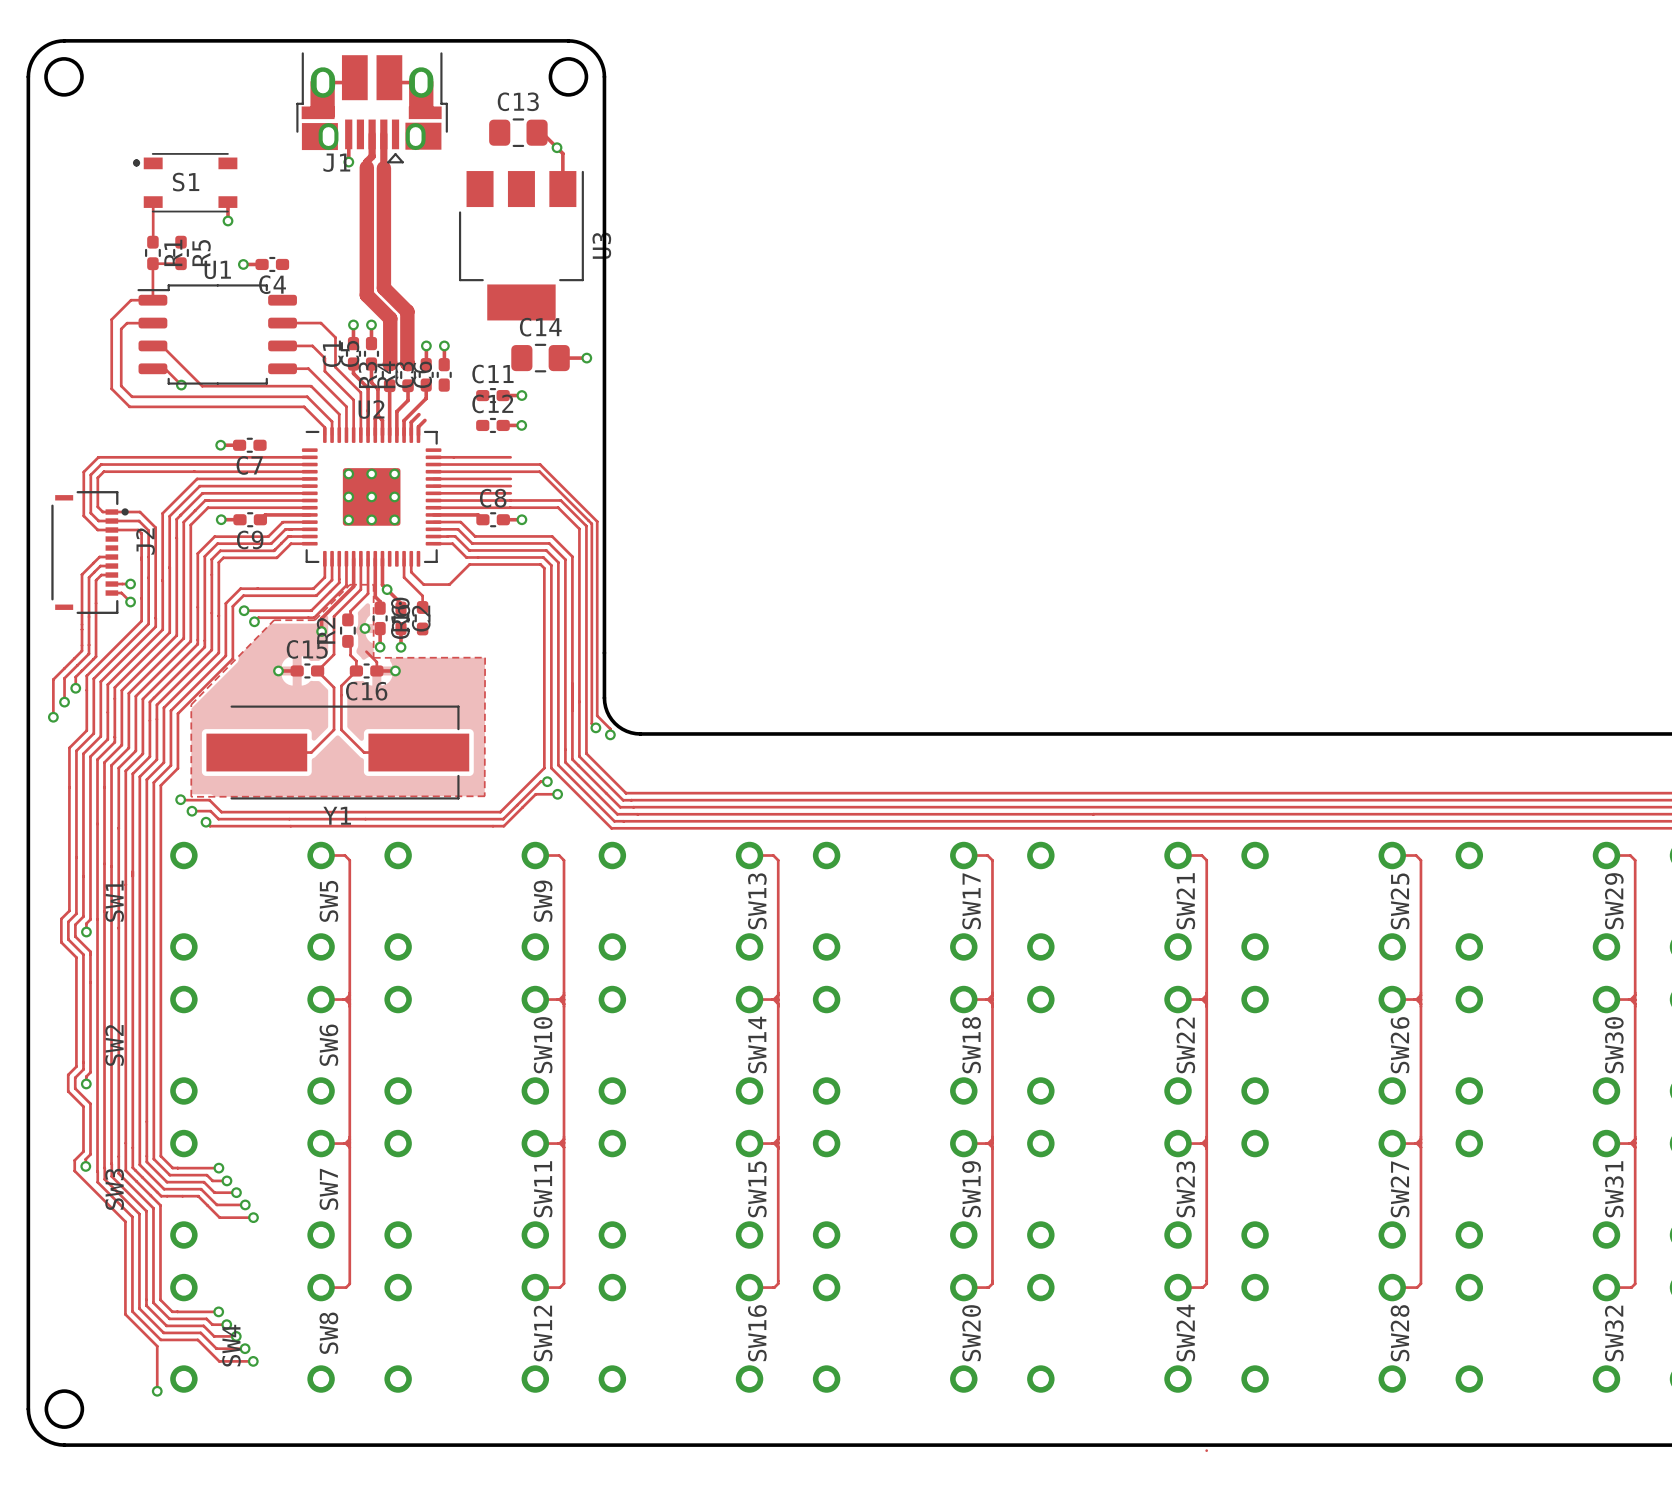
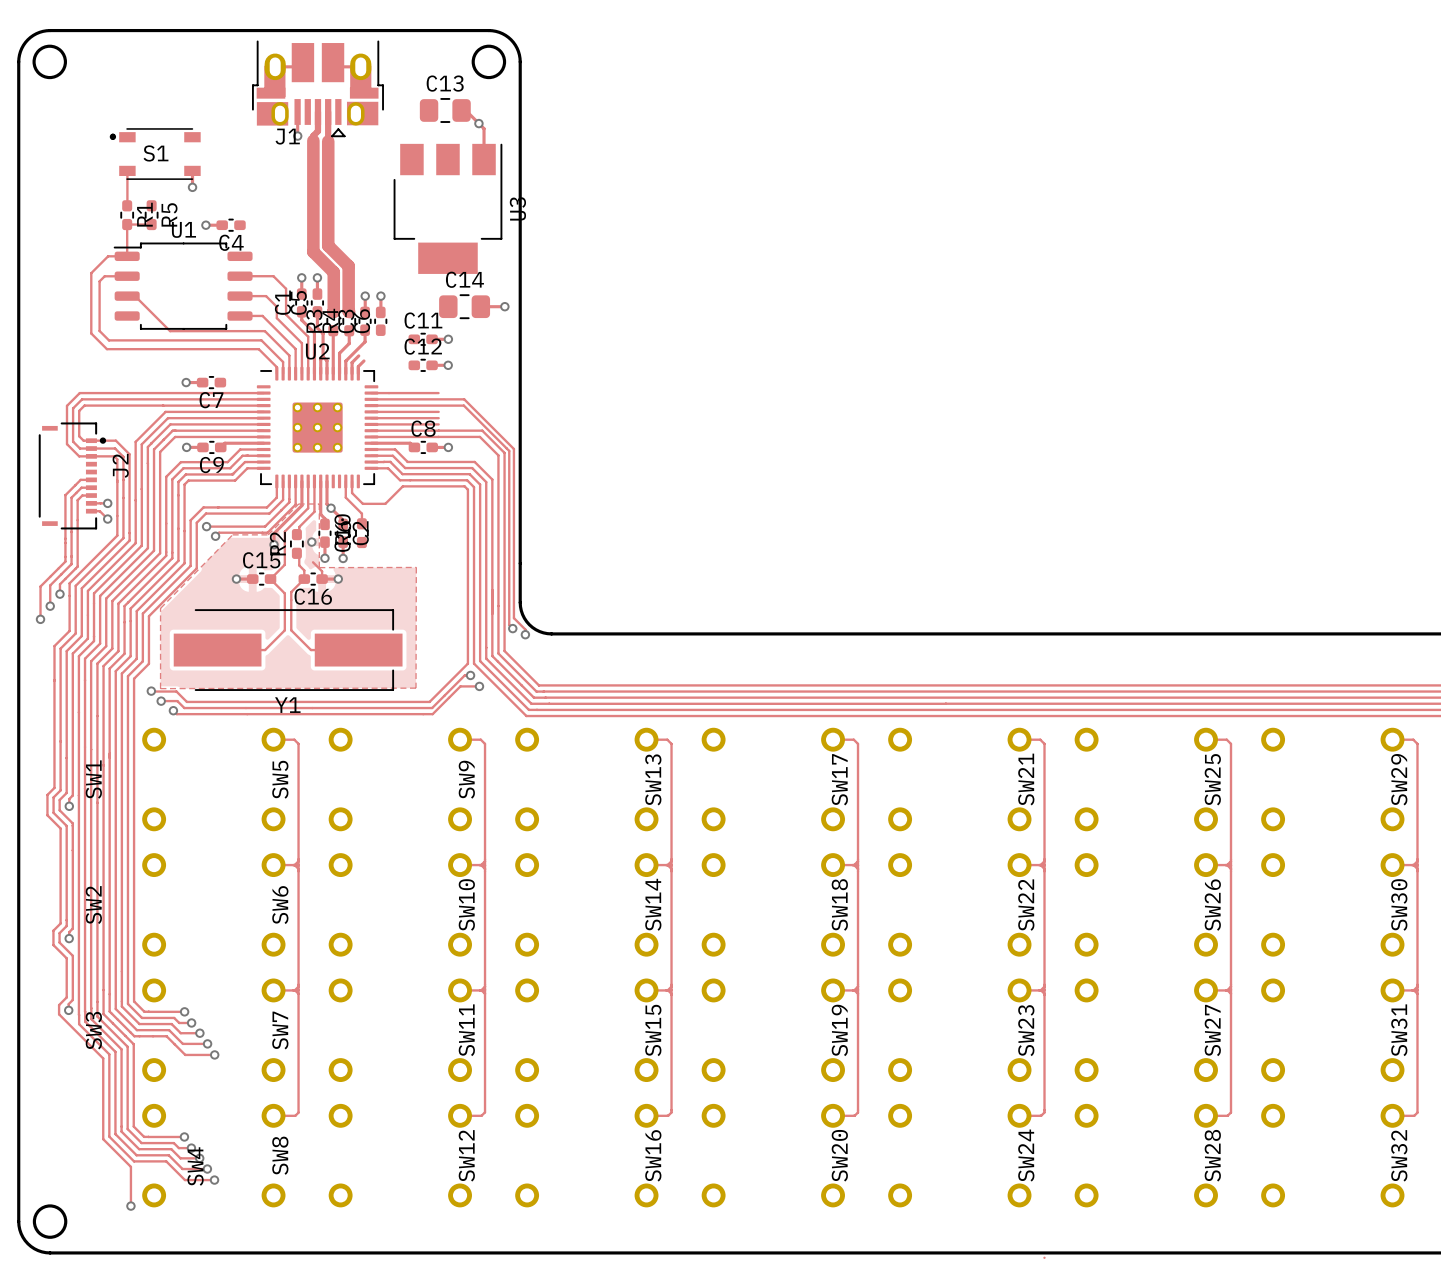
track: (152, 368) (165, 368) (181, 385) -> none
via: (181, 385) -> none

